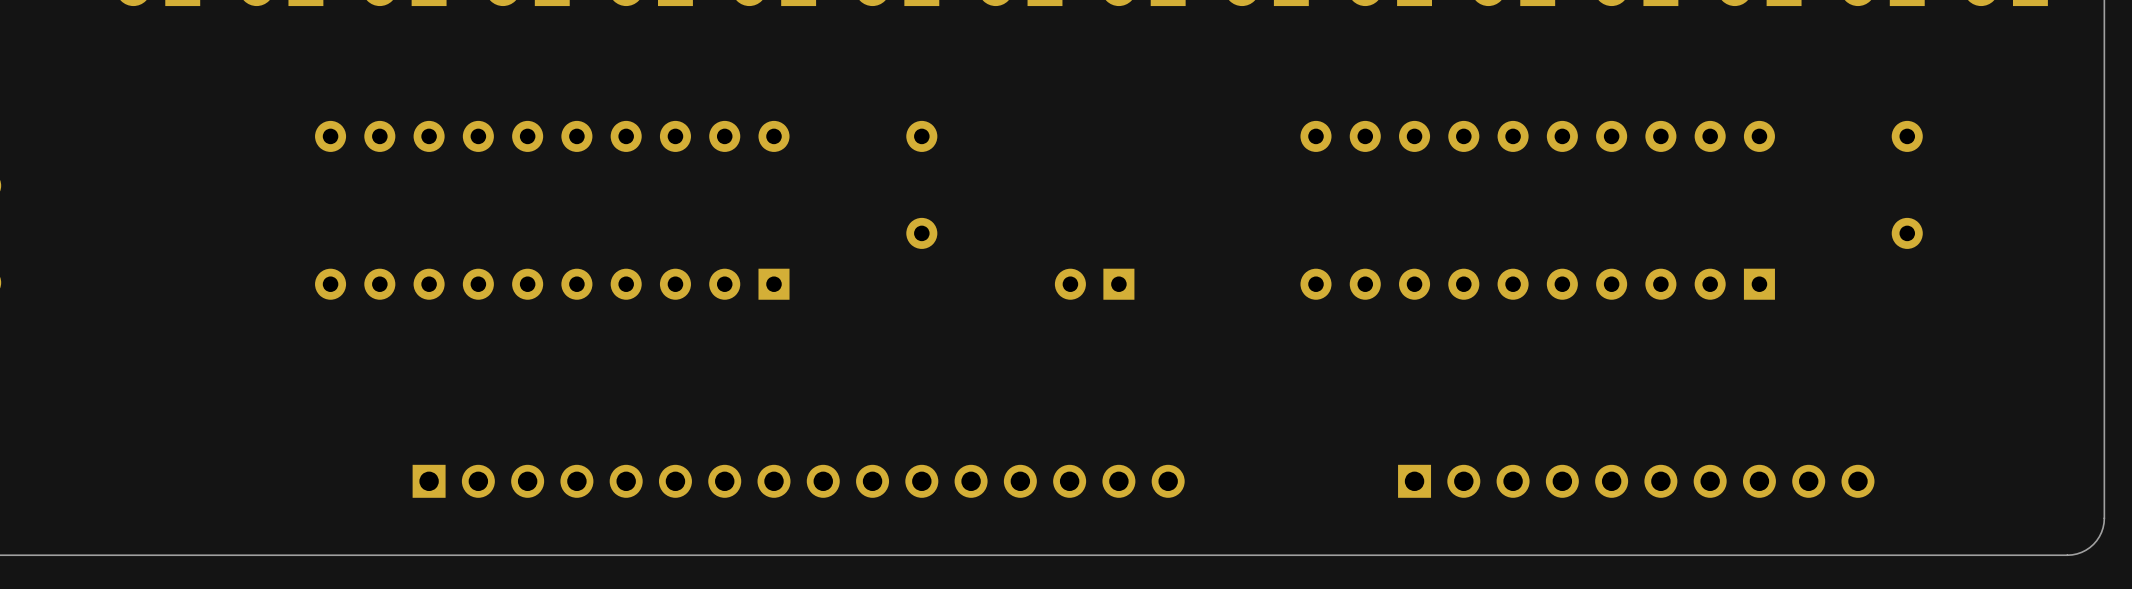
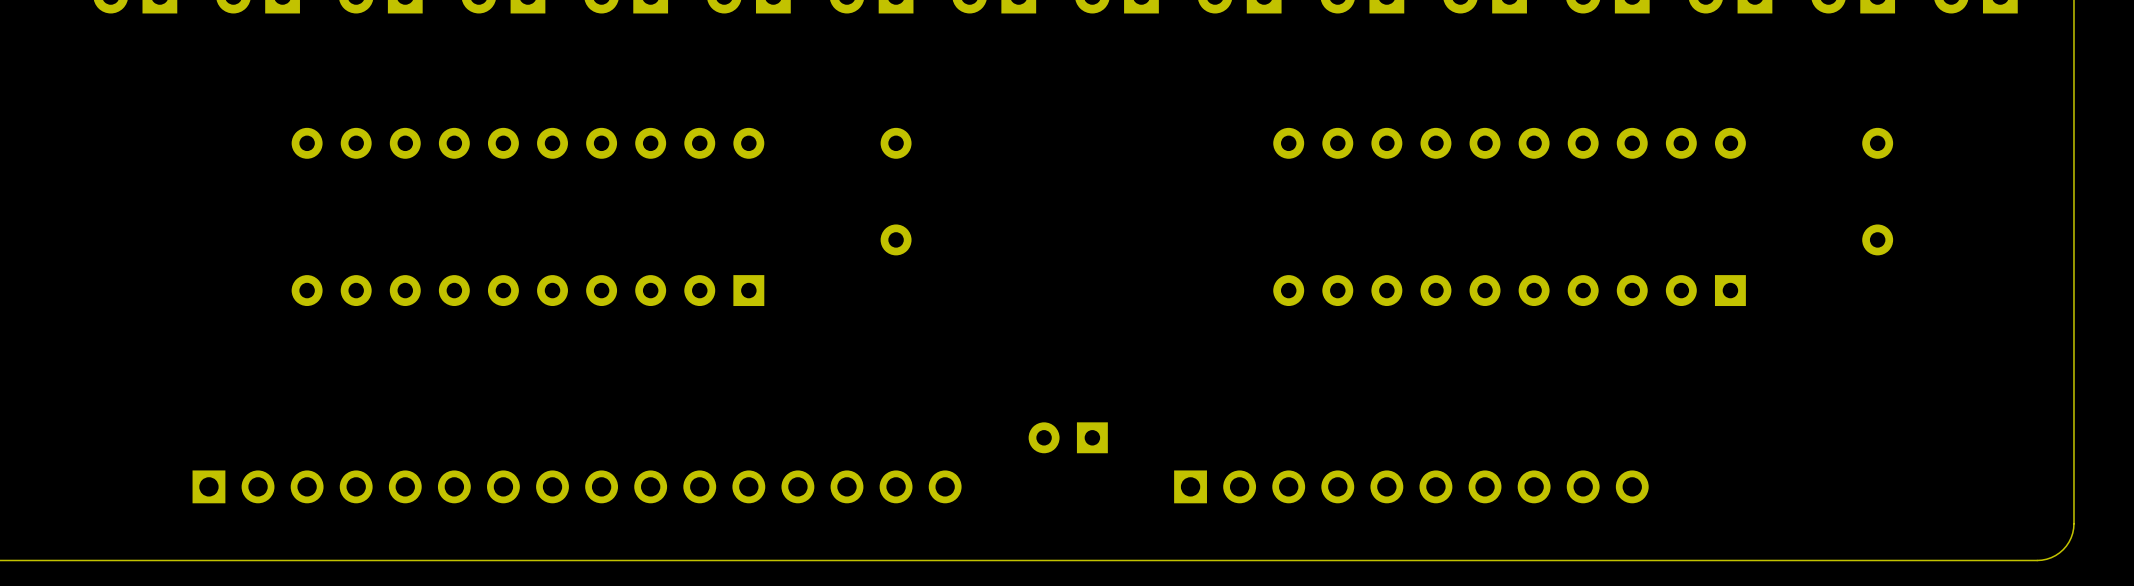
part position: (1094, 284) -> (1068, 437)
part position: (798, 481) -> (577, 486)
part position: (1636, 481) -> (1411, 486)

